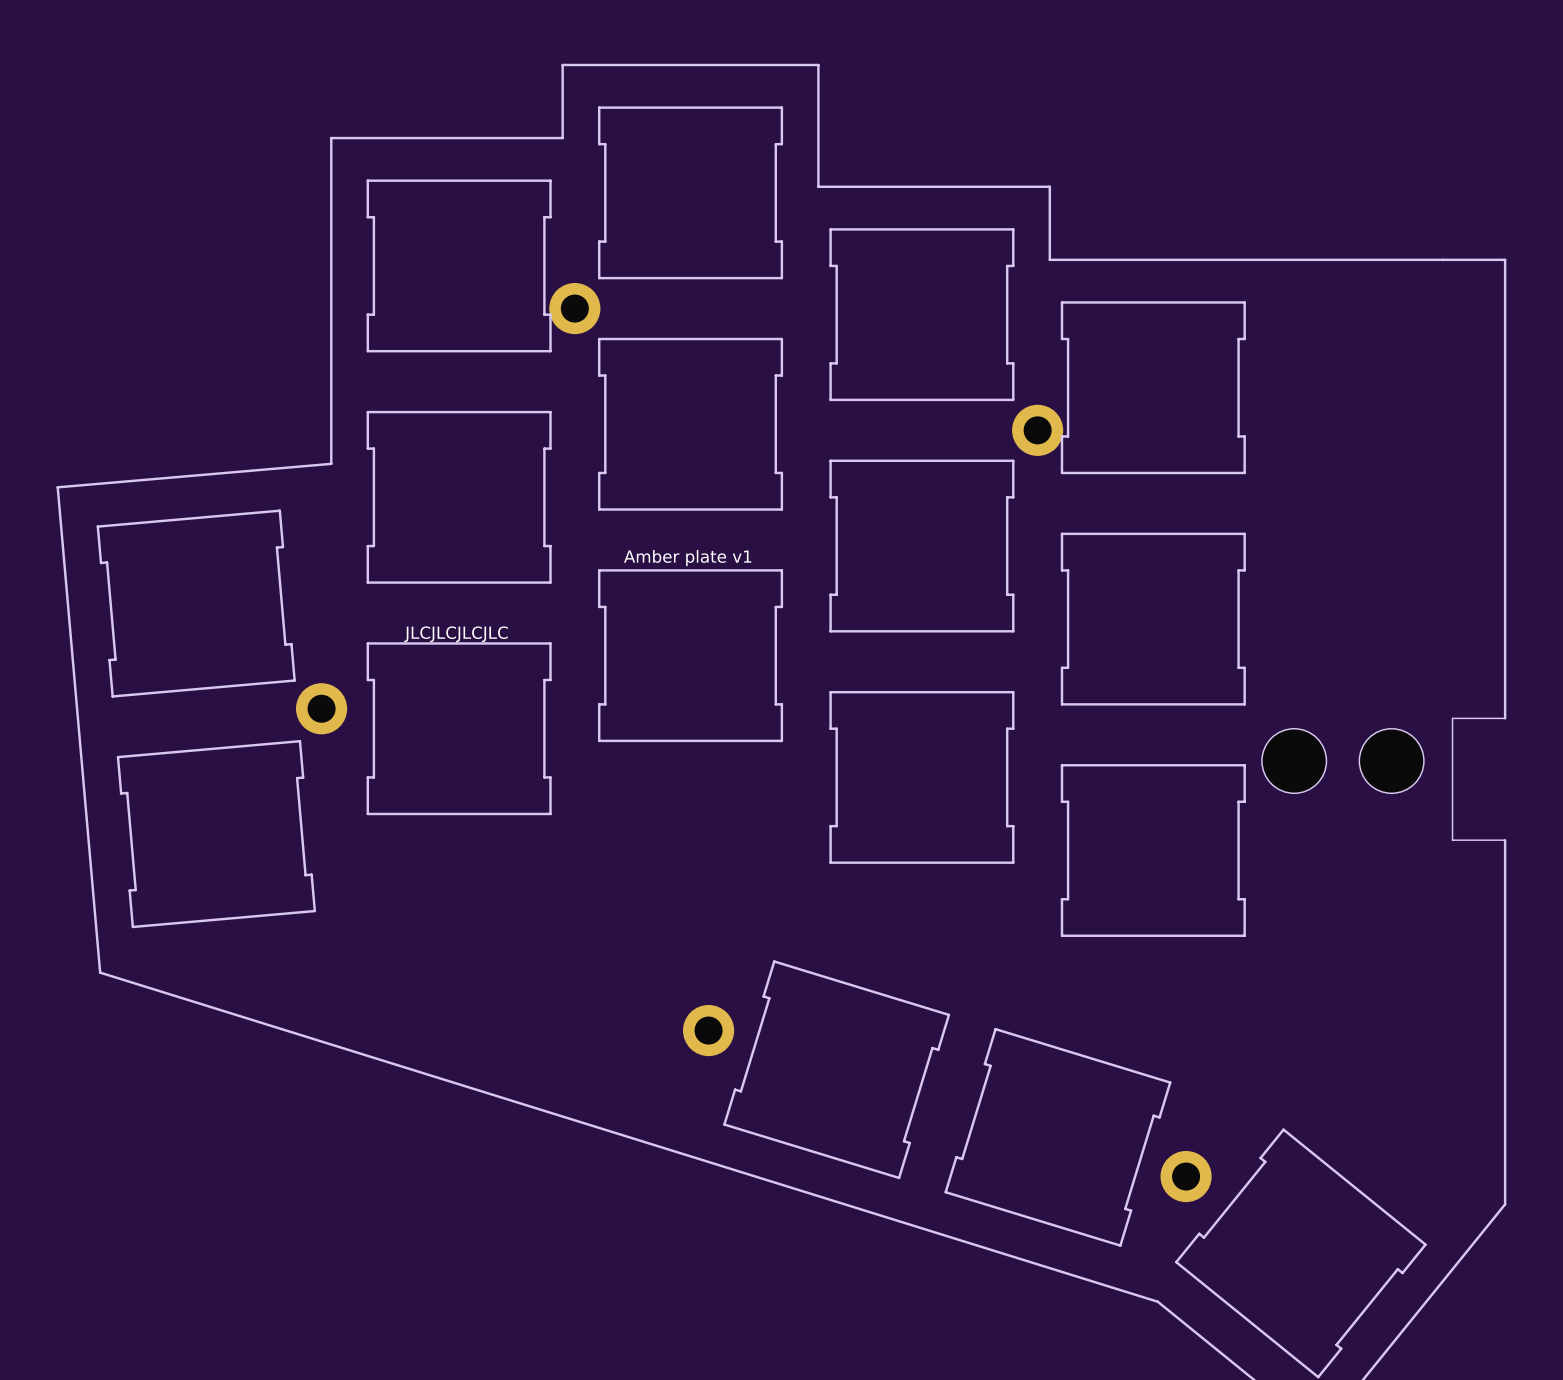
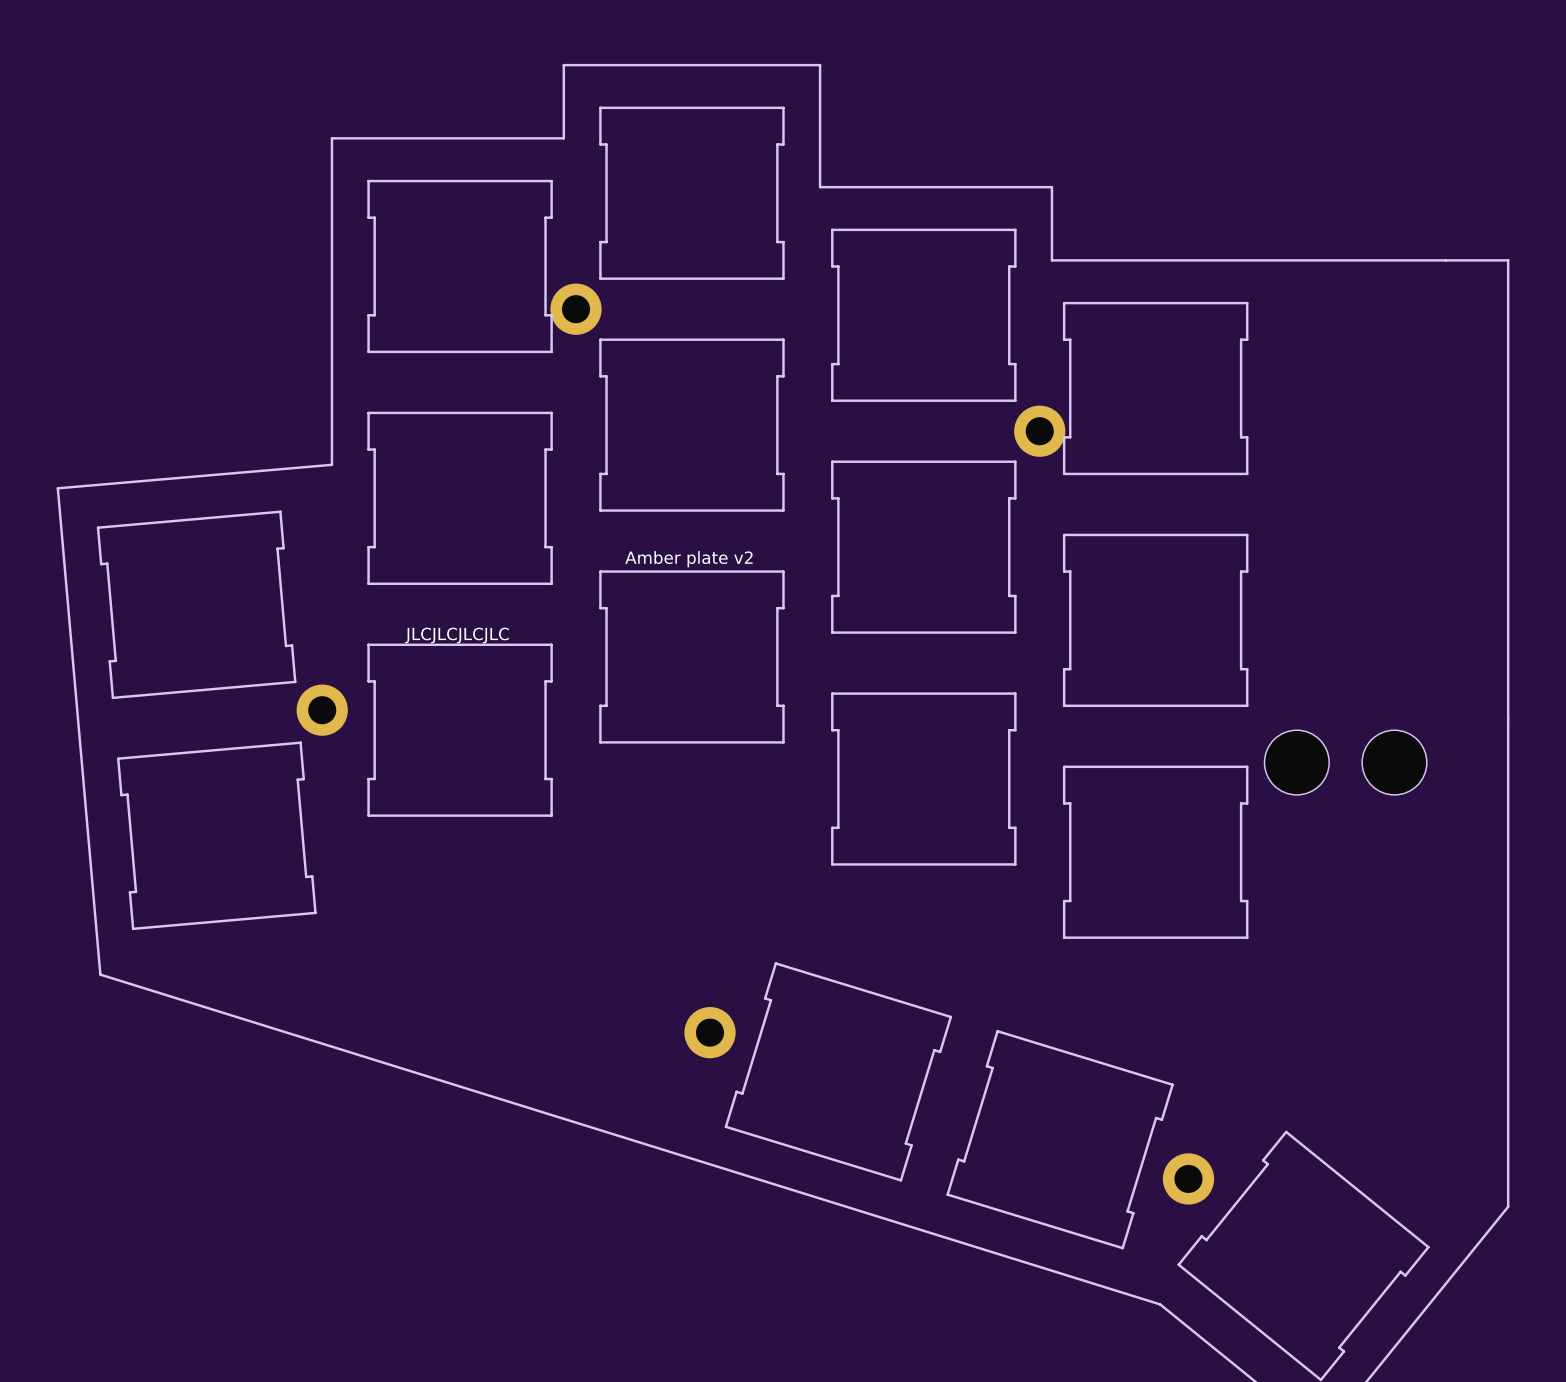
text: Amber plate v1 (687, 558) -> Amber plate v2 (688, 559)
board edge: (1505, 718) (1452, 718) (1452, 840) (1505, 840) -> (1508, 719) (1508, 841)

